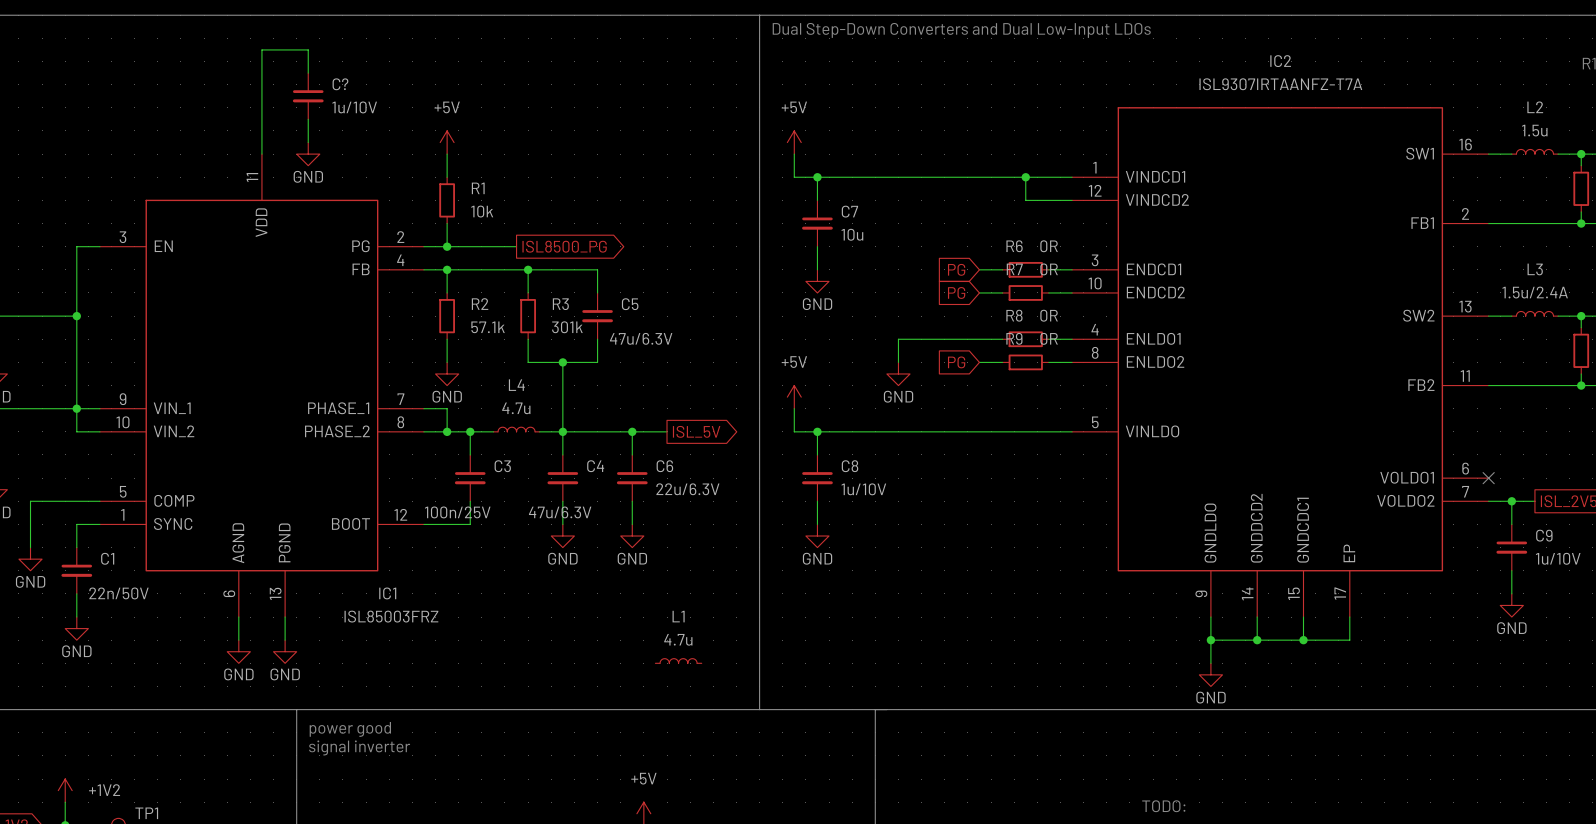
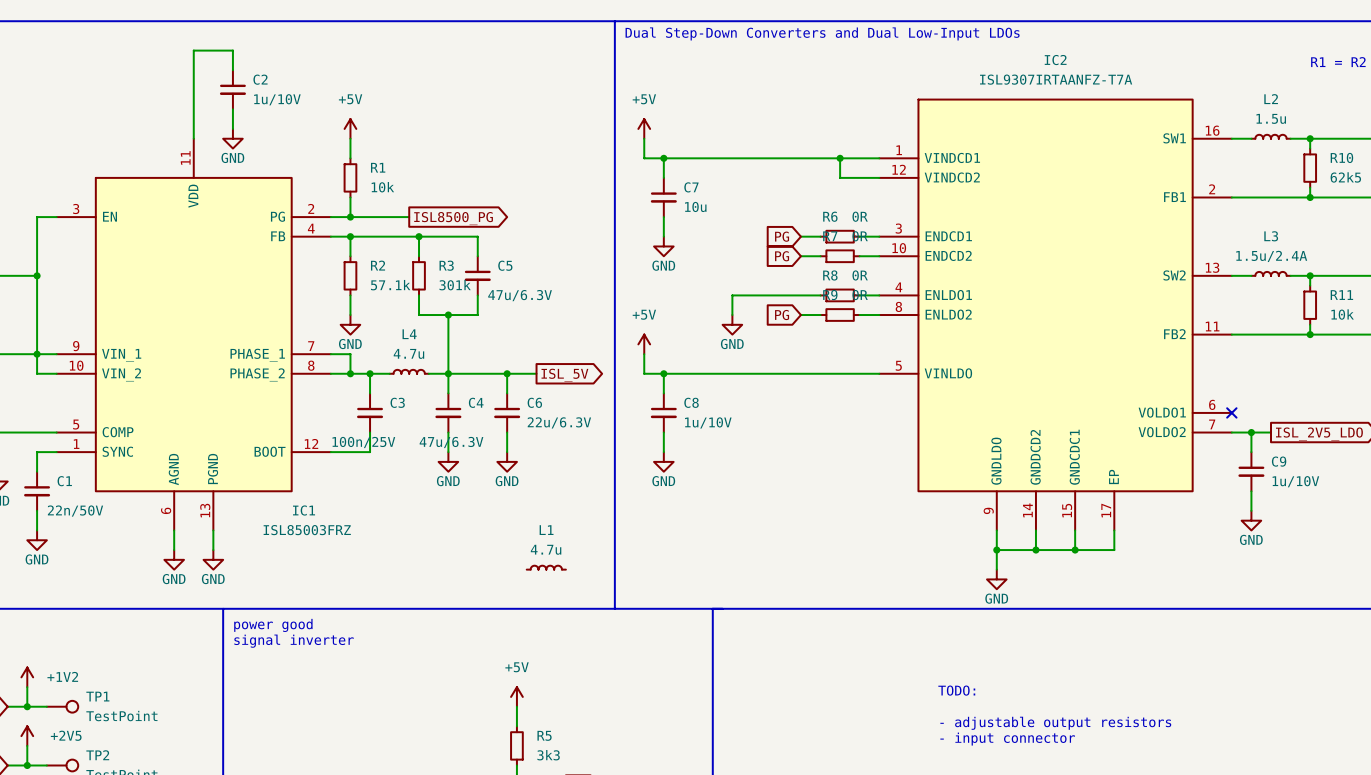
C? name: C? (340, 84) -> C2 (260, 79)

